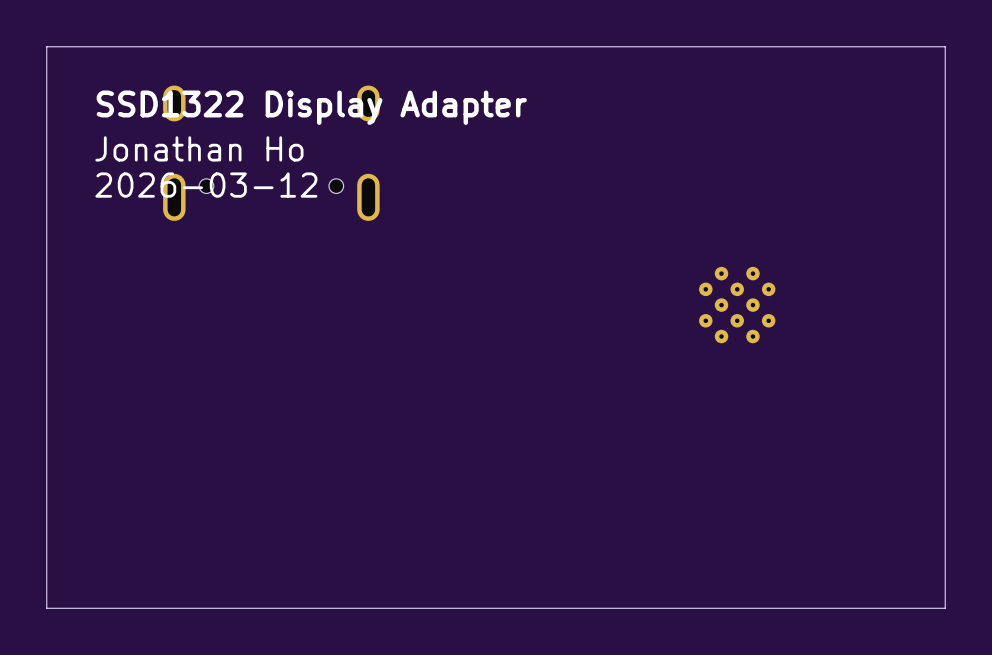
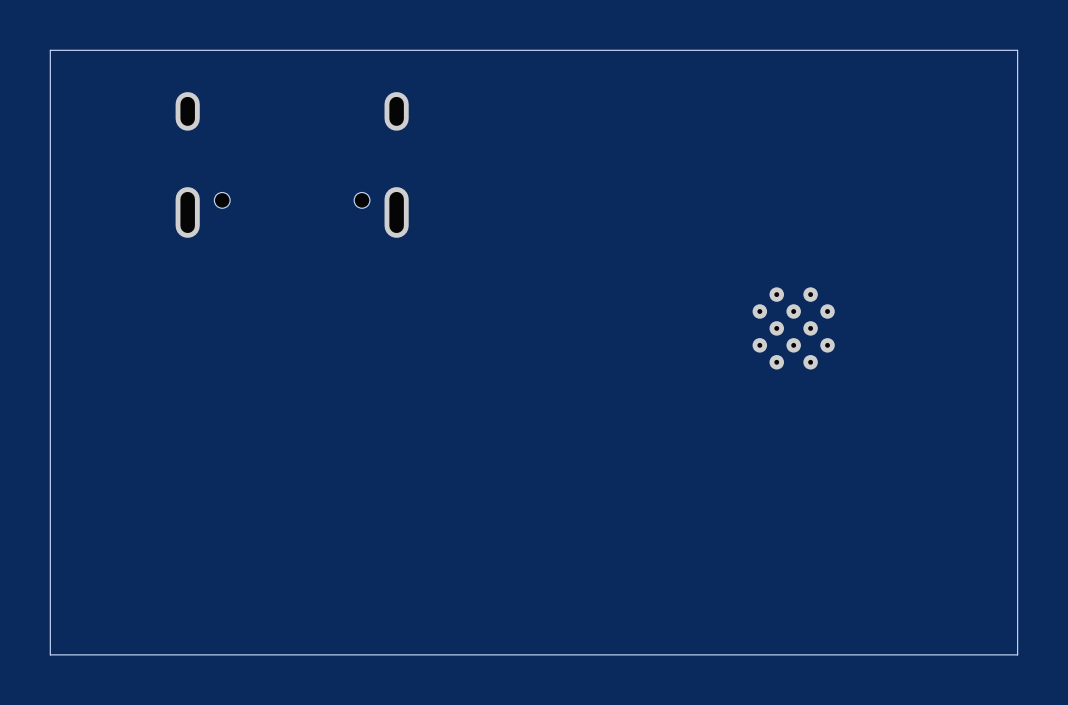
text: SSD1322 Display Adapter (311, 107) -> none
text: Jonathan Ho (199, 148) -> none
text: 2026-03-12 (206, 185) -> none

